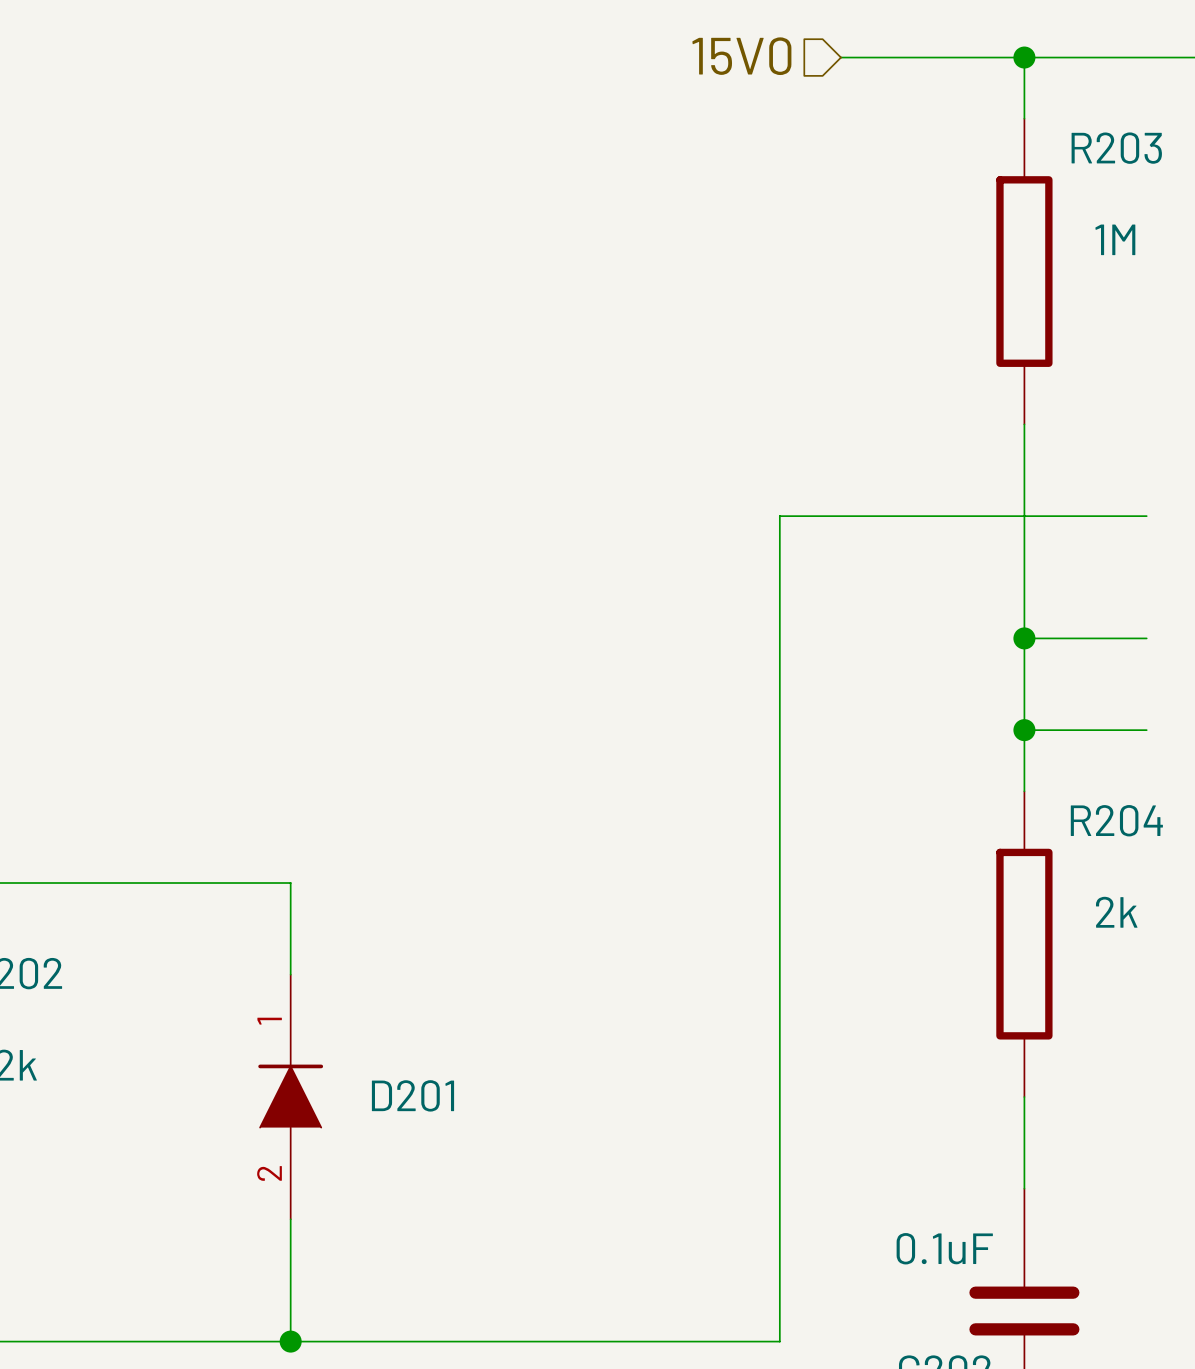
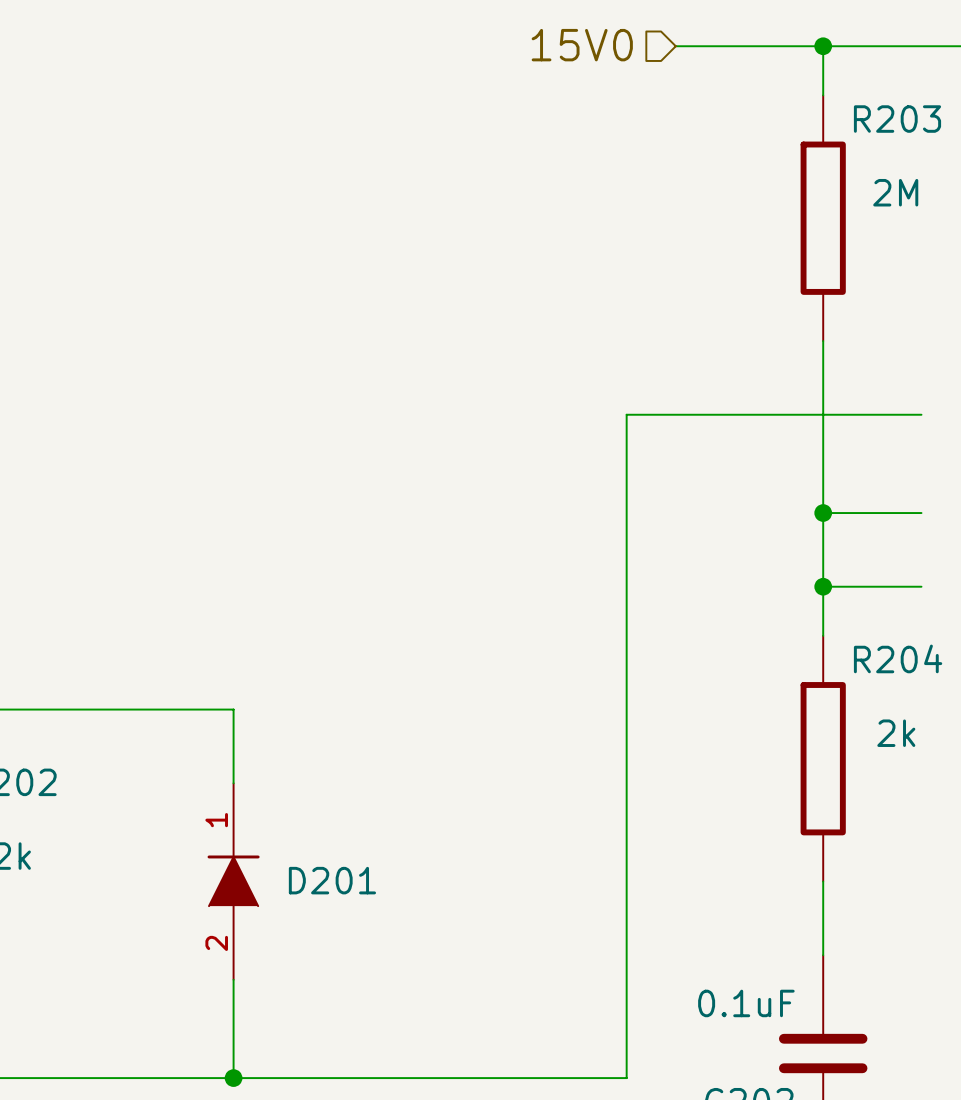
R203 value: 1M (1115, 239) -> 2M (895, 192)

